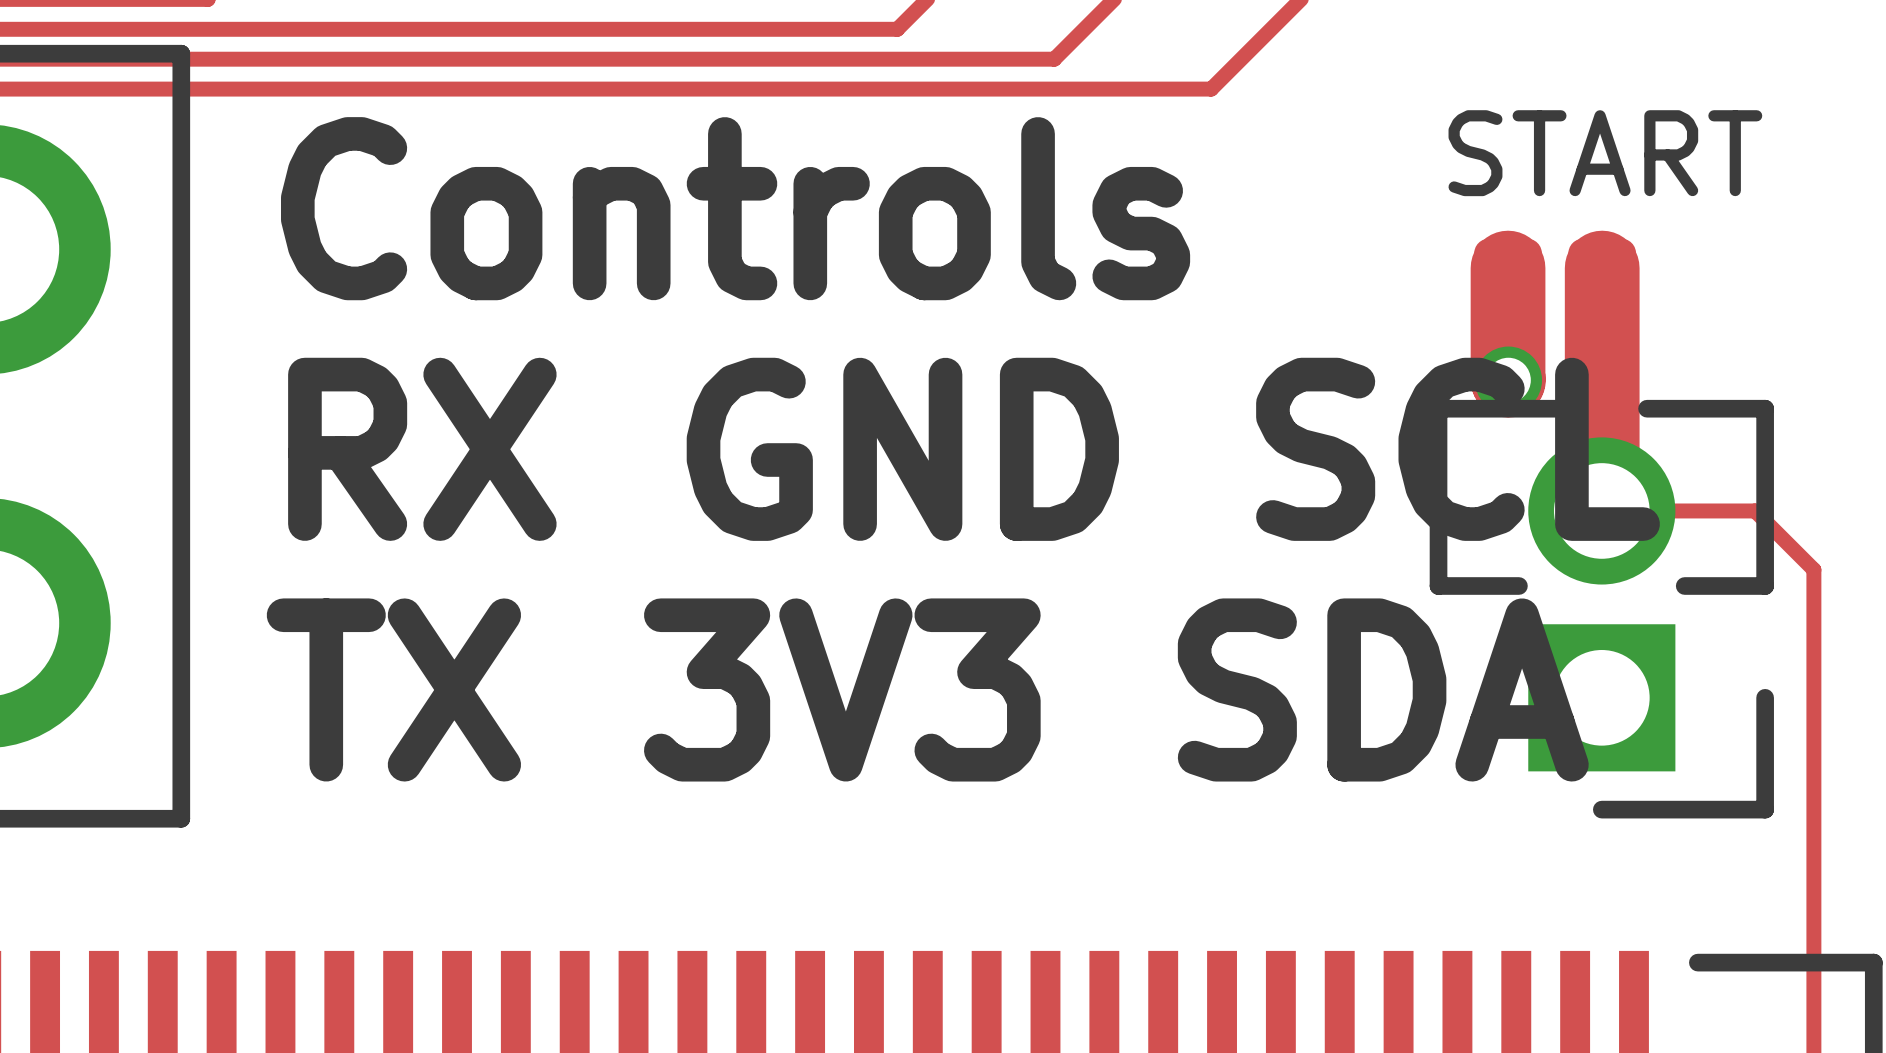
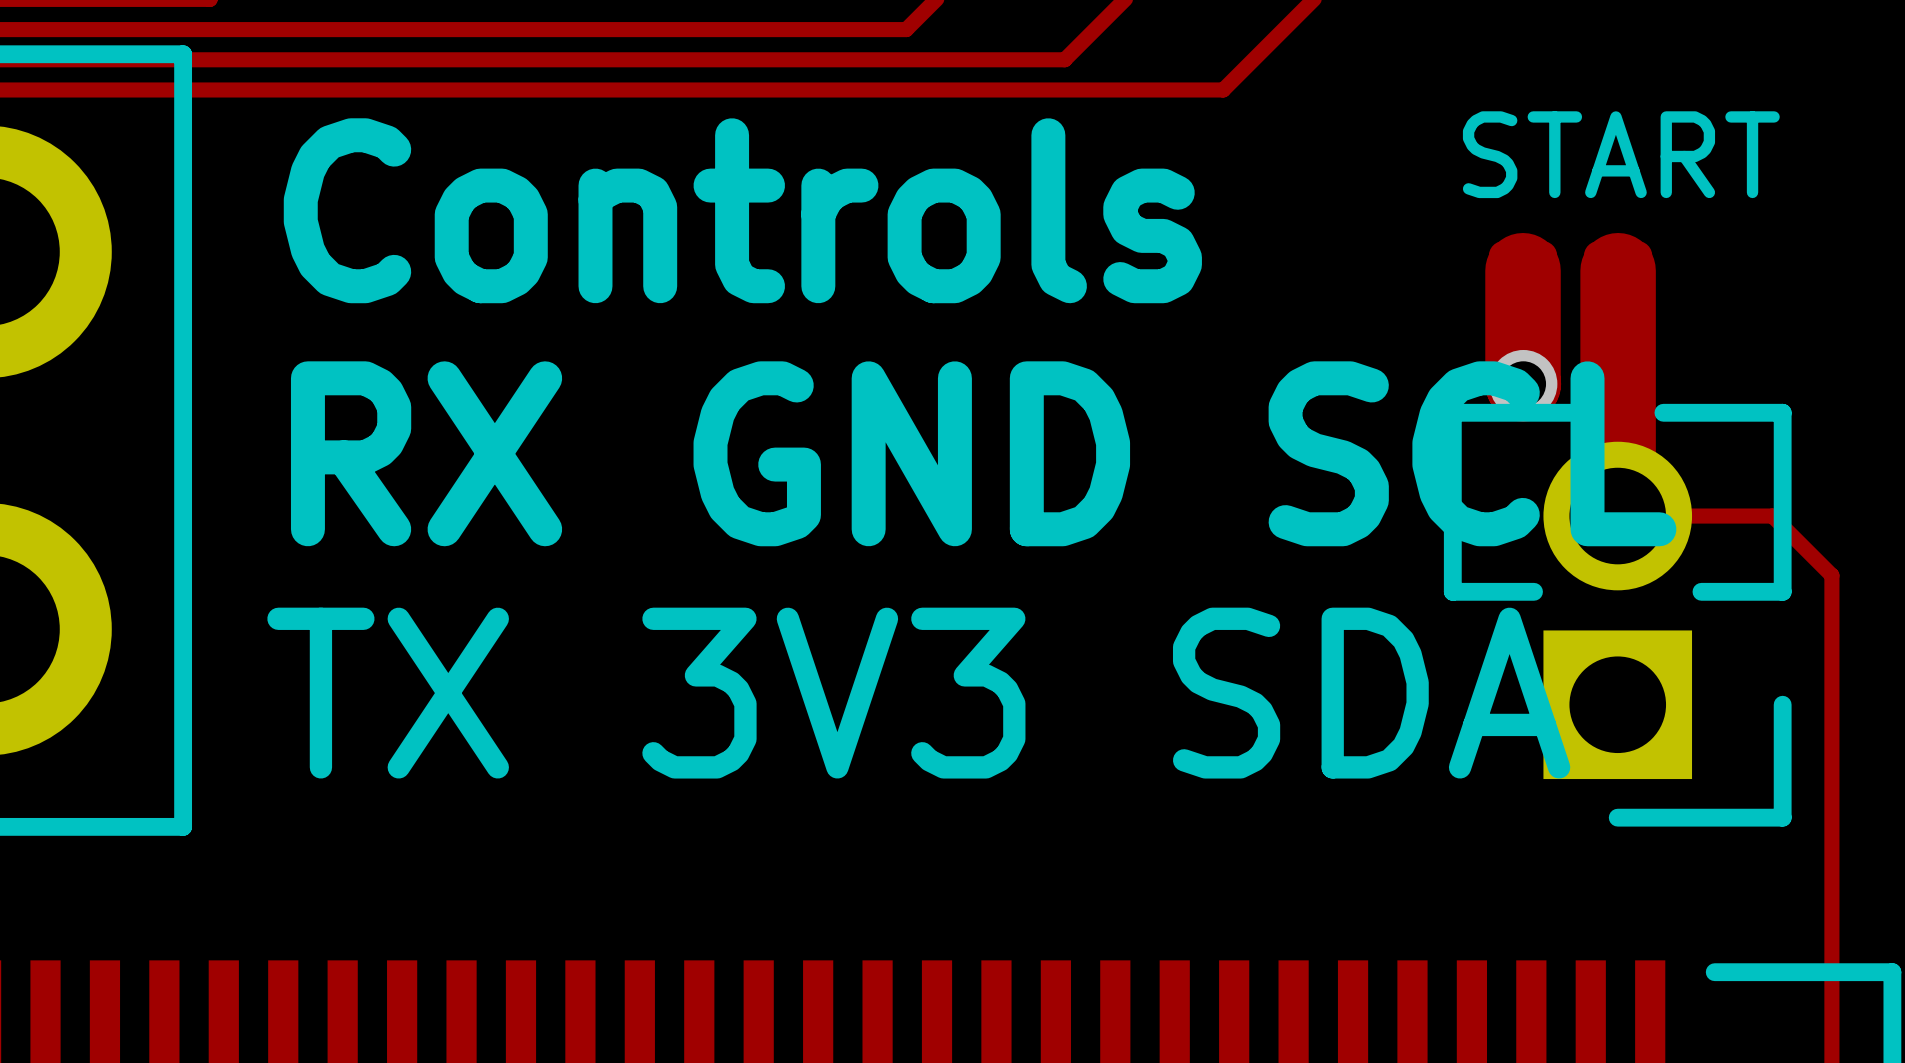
text position: TX 3V3 SDA (927, 689) -> TX 3V3 SDA (918, 693)

